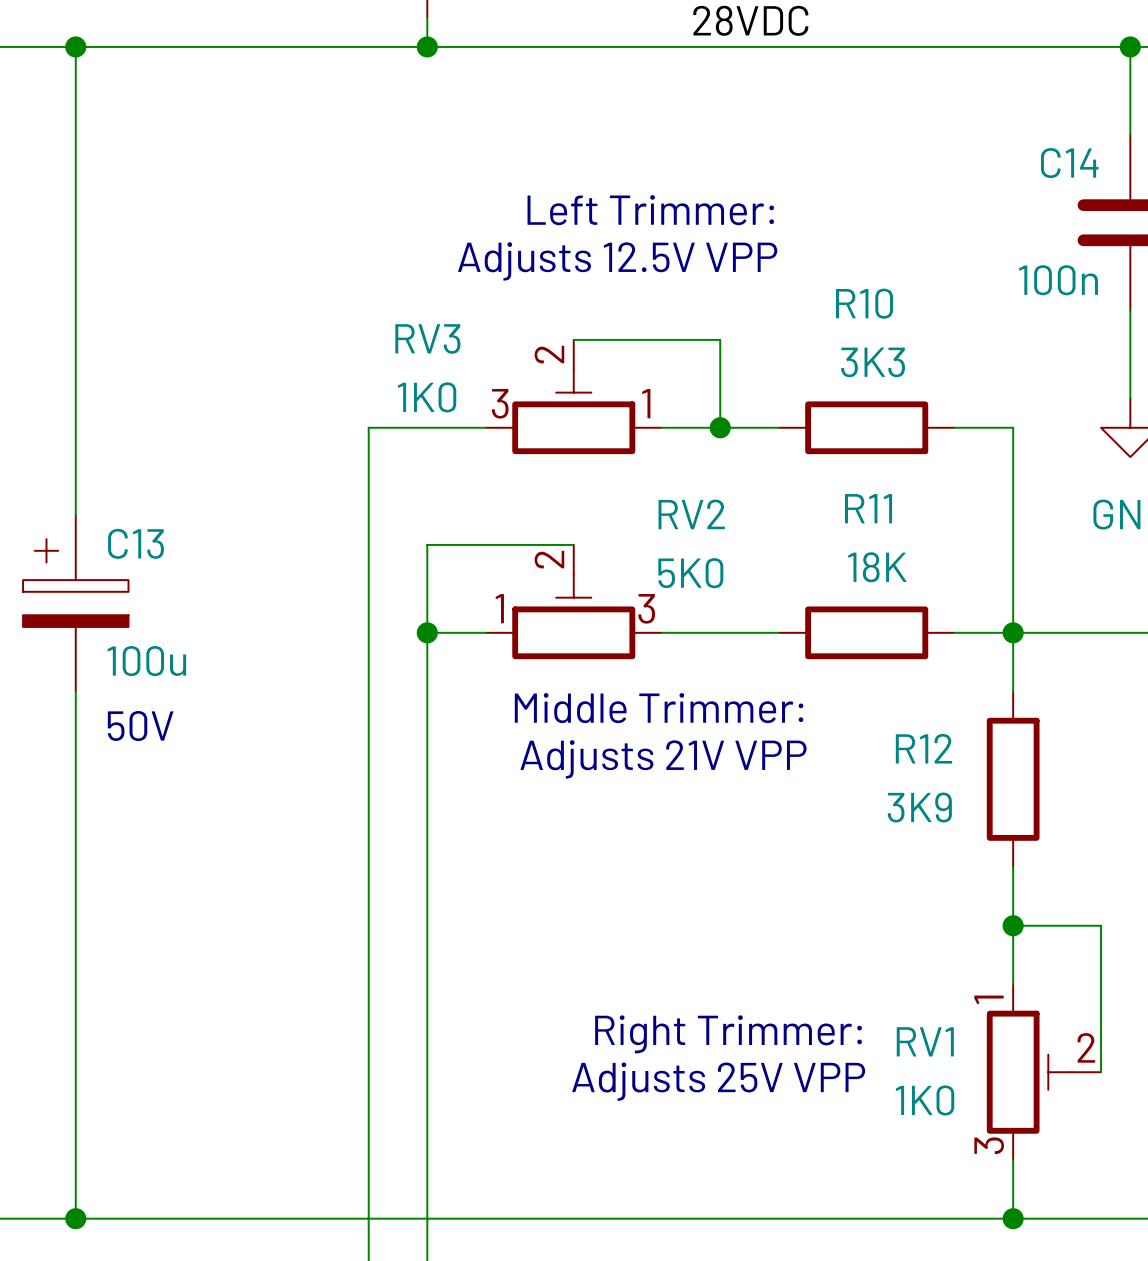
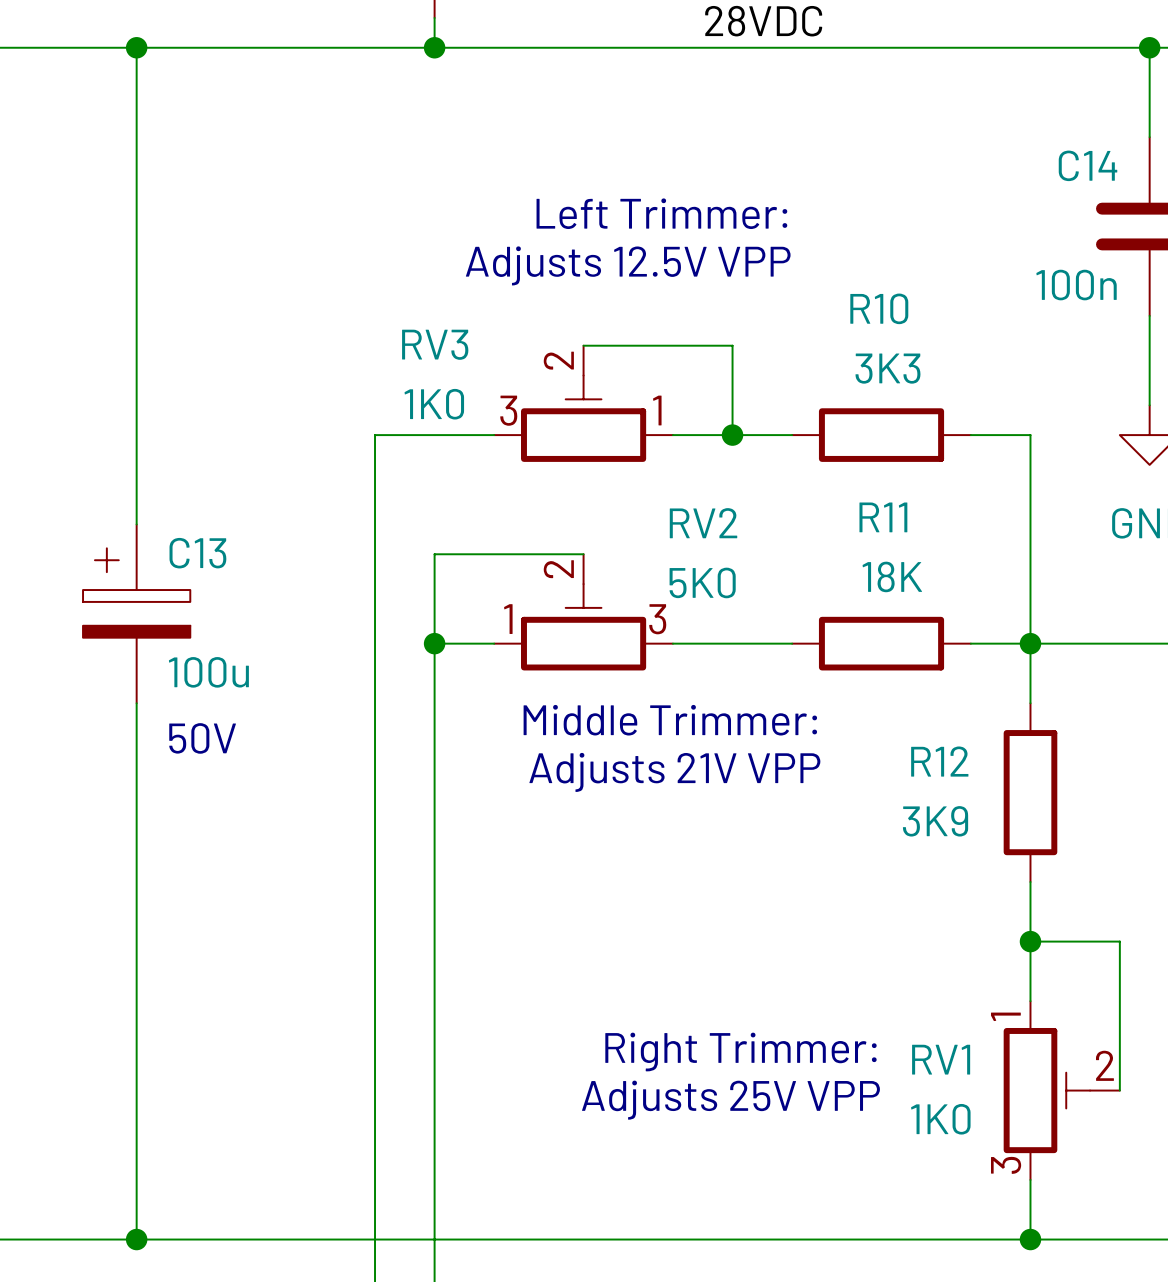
wire: (75, 46) (75, 515) -> (136, 47) (136, 524)
junction position: (75, 46) -> (136, 47)
C13 position: (75, 603) -> (136, 613)
wire: (75, 691) (75, 1218) -> (136, 703) (136, 1239)
text position: 50V (140, 726) -> 50V (202, 738)
junction position: (75, 1218) -> (136, 1239)

